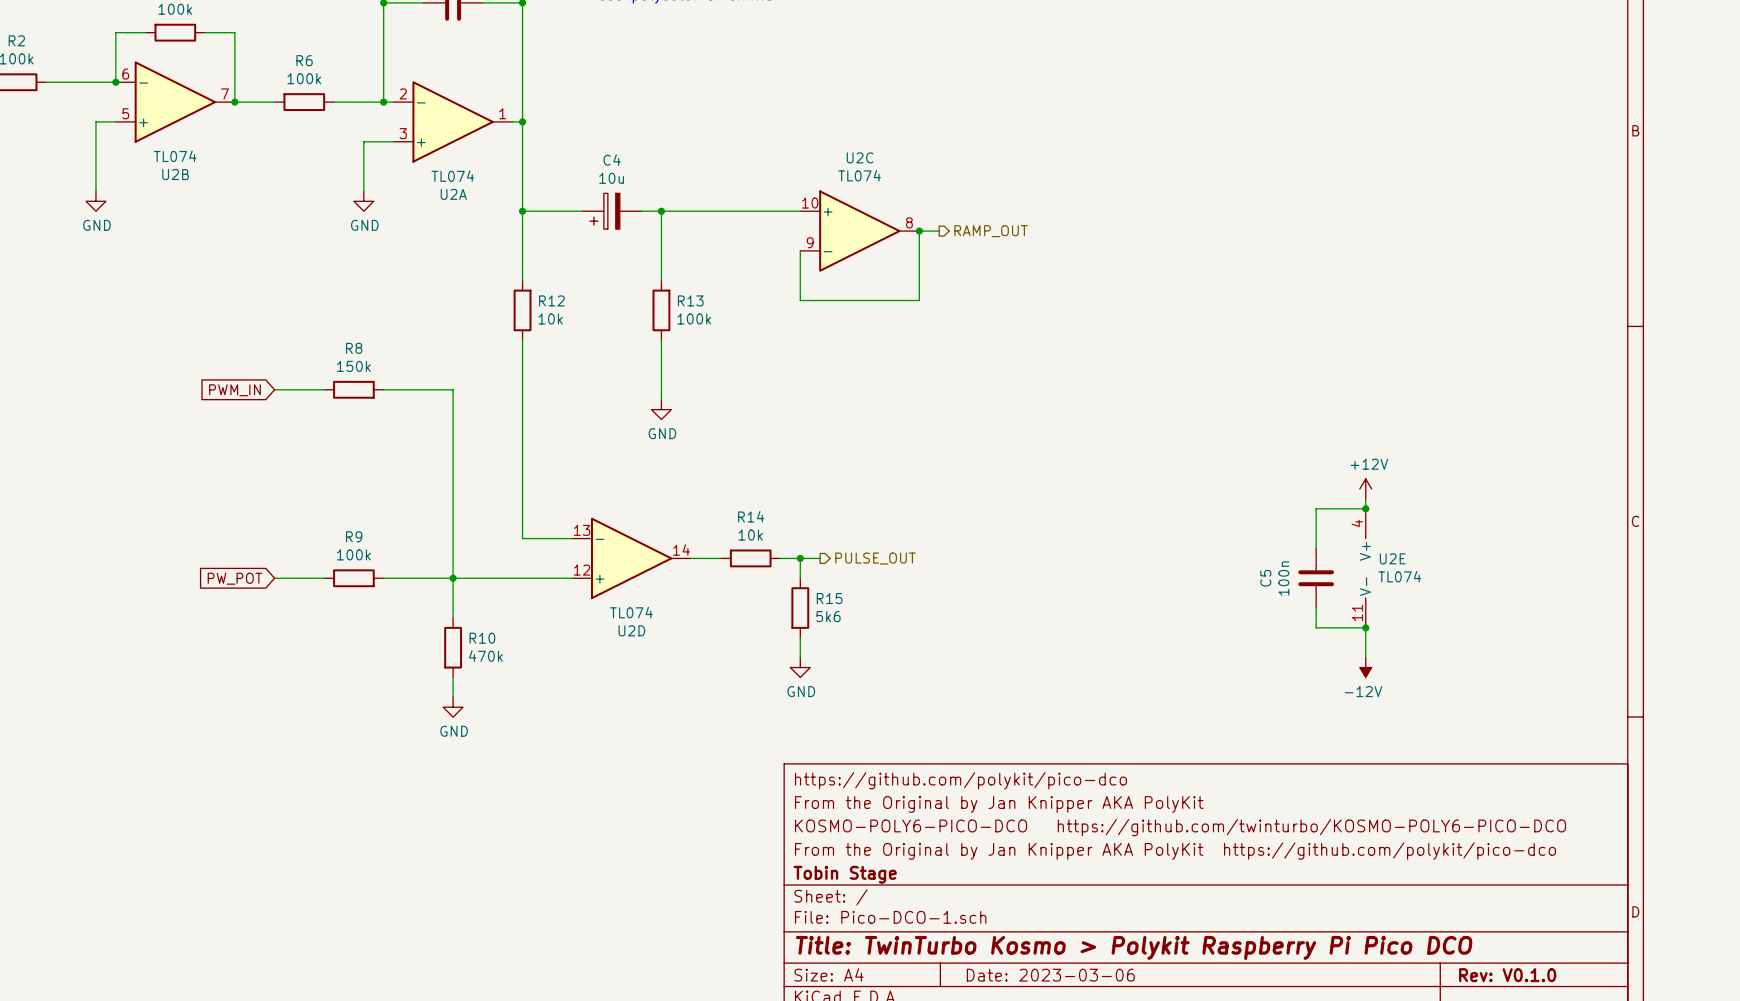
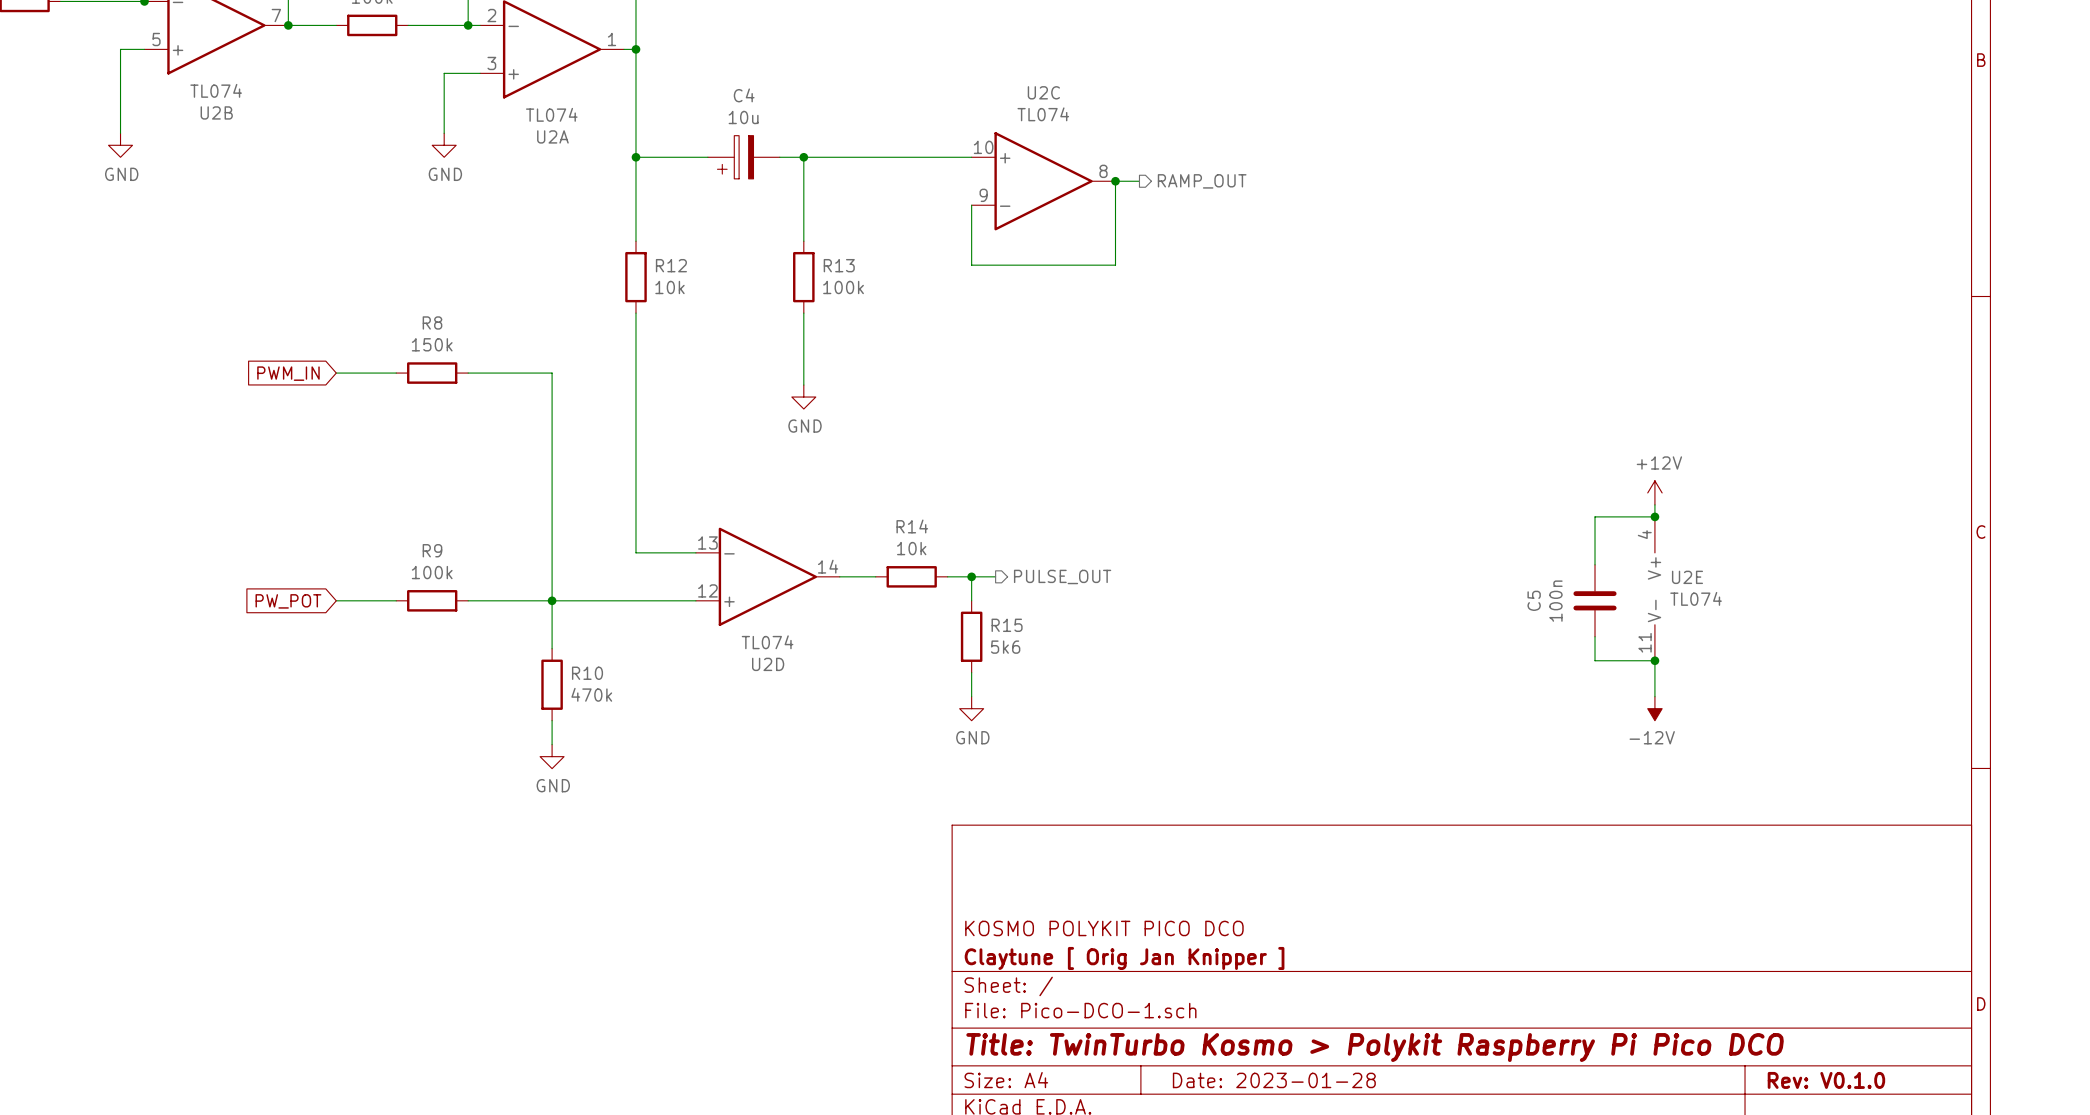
title block: https://github.com/polykit/pico-dco (960, 780) -> none
title block: From the Original by Jan Knipper AKA PolyKit (999, 804) -> none
title block: KOSMO-POLY6-PICO-DCO https://github.com/twinturbo/KOSMO-POLY6-PICO-DCO (1180, 827) -> none
title block: From the Original by Jan Knipper AKA PolyKit https://github.com/polykit/pico-dco (1175, 851) -> KOSMO POLYKIT PICO DCO (1104, 928)
title block: Tobin Stage (845, 874) -> Claytune [ Orig Jan Knipper ] (1124, 958)
title block: Date: 2023-03-06 (1050, 975) -> Date: 2023-01-28 (1274, 1080)

